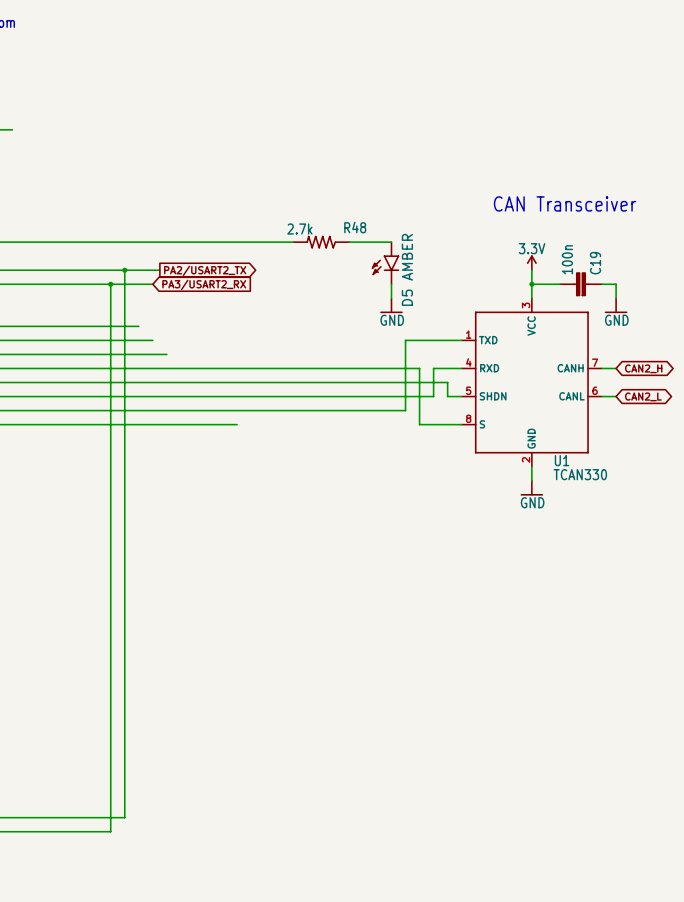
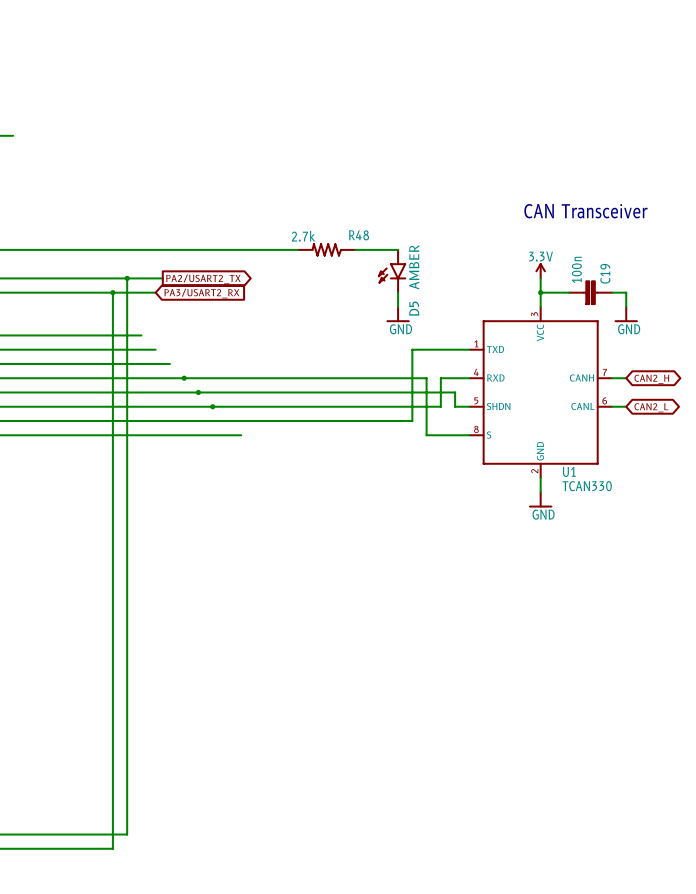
junction: none -> (184, 378)
junction: none -> (198, 392)
junction: none -> (212, 406)

